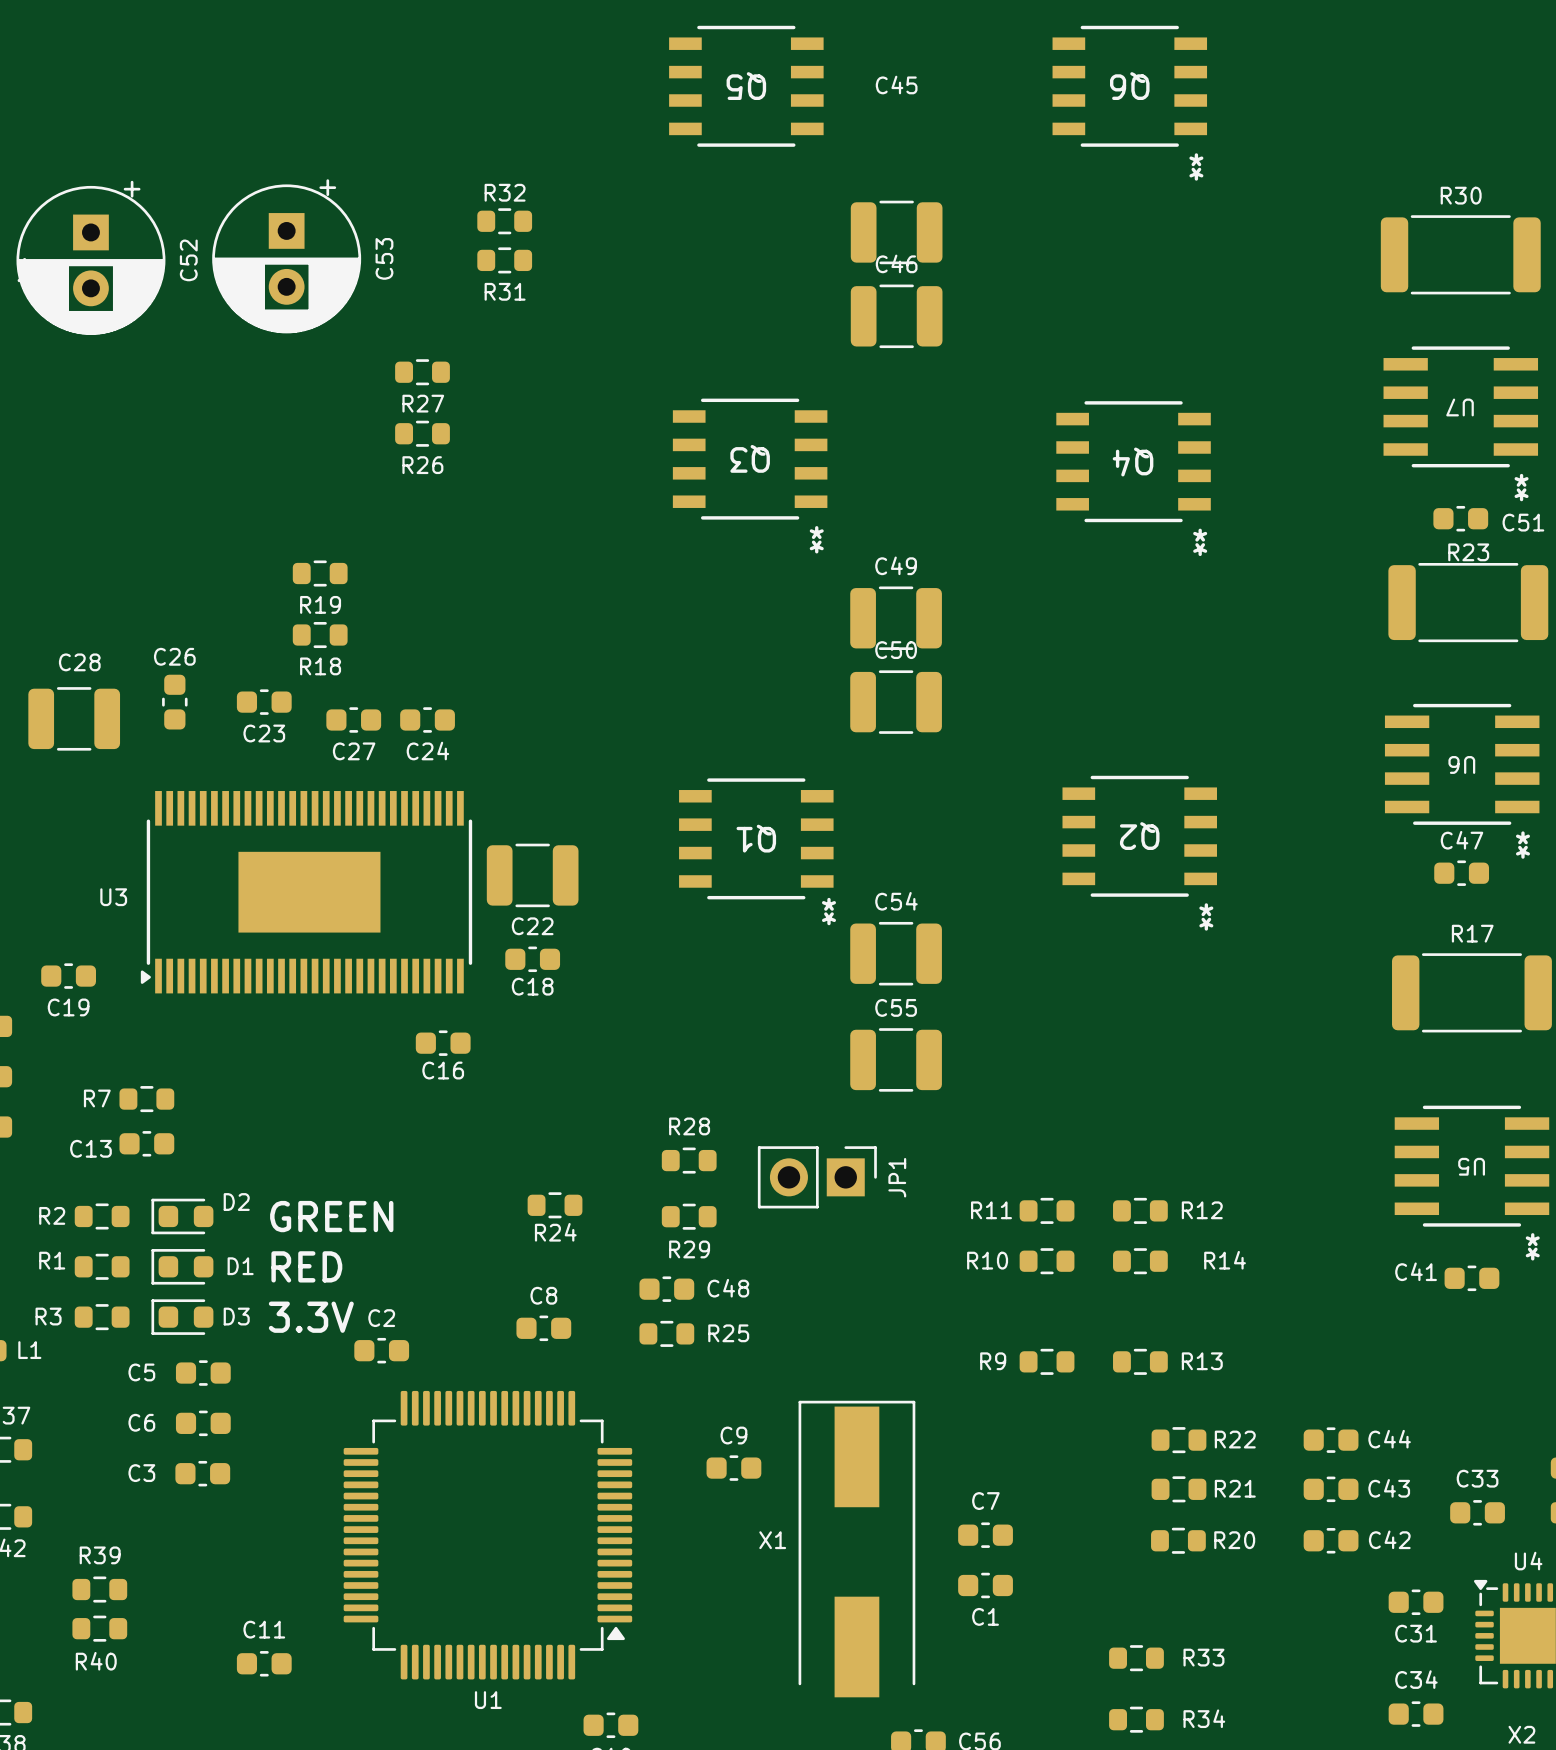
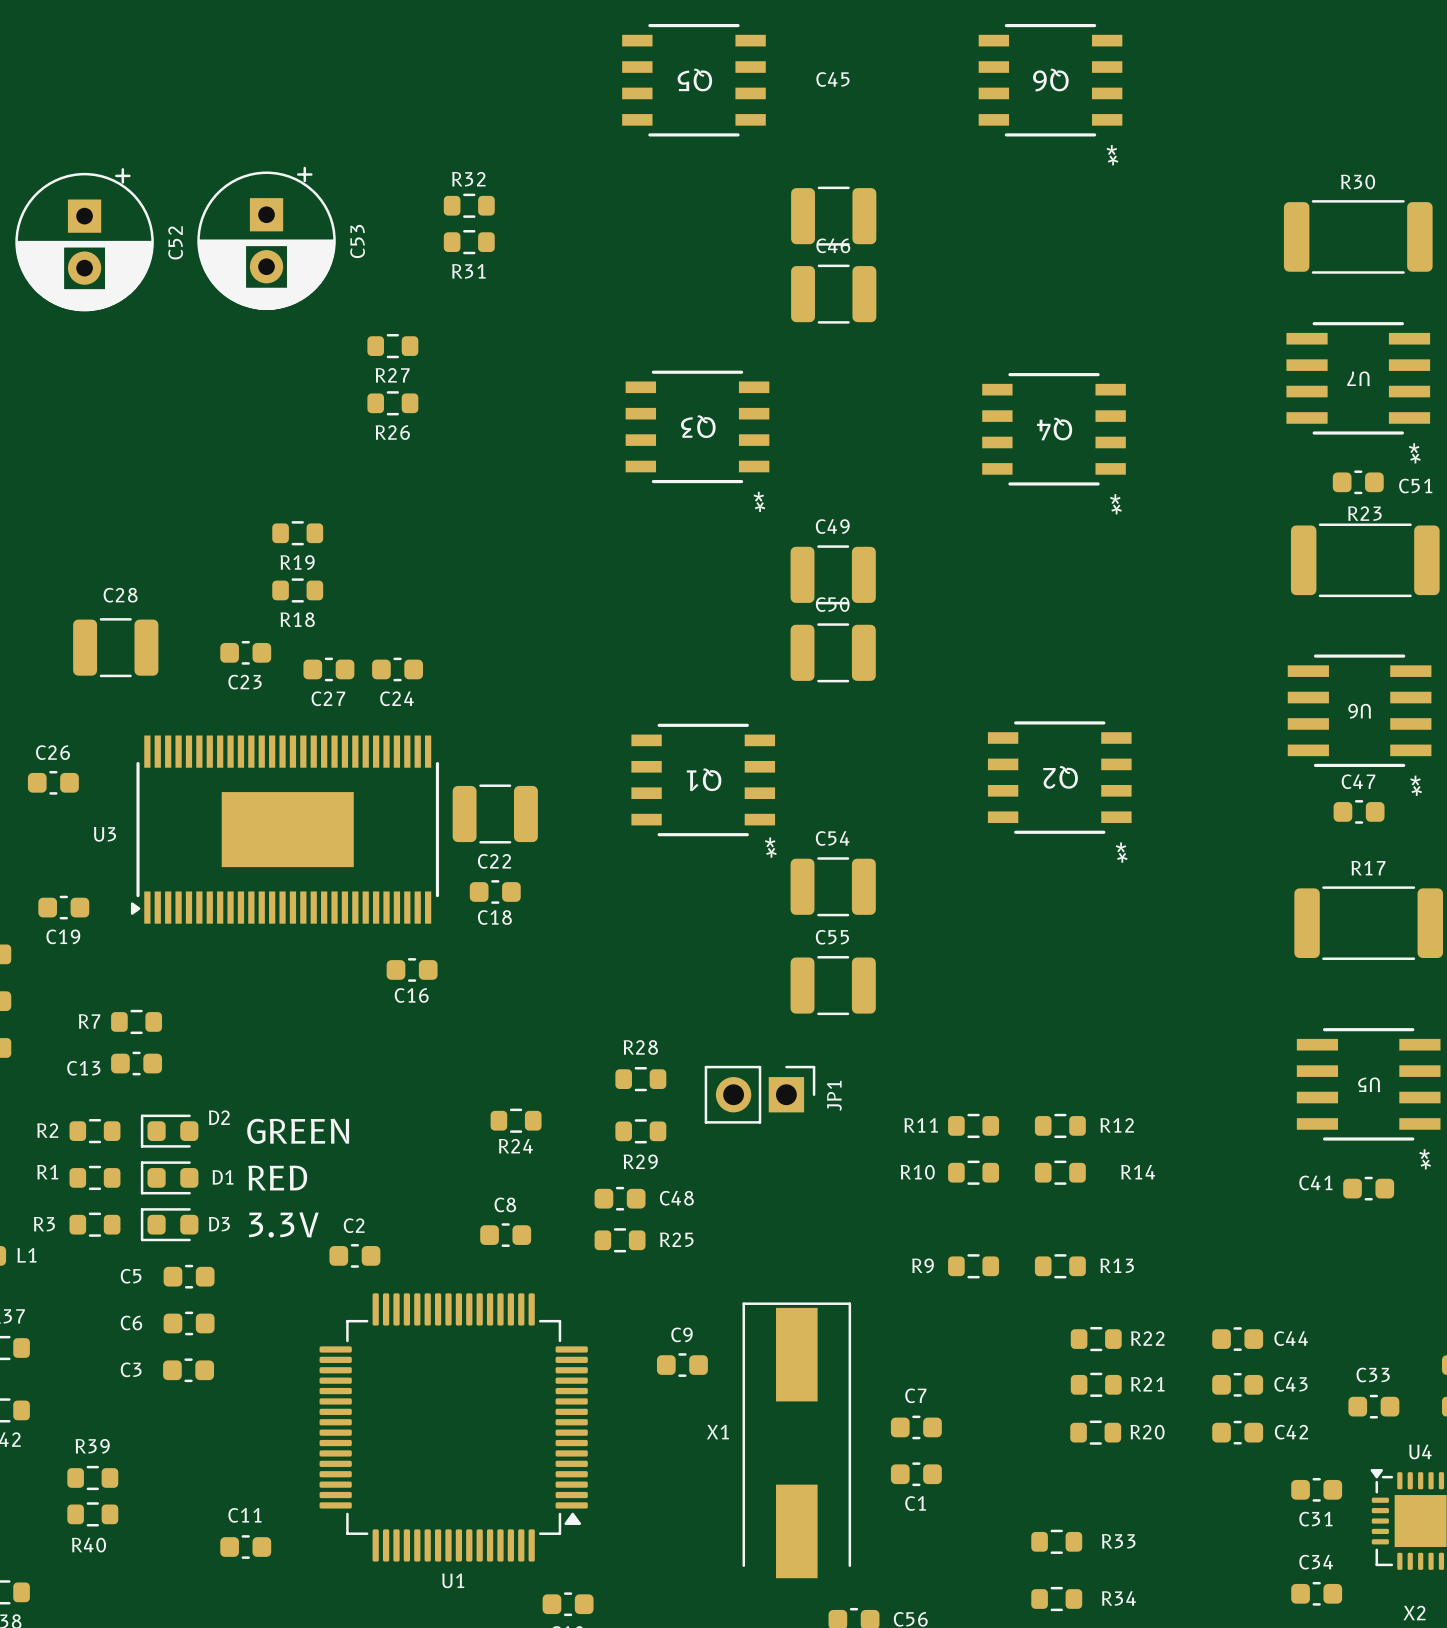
C26 rotation: 0° (174, 702) -> 90° clockwise (53, 782)
C26 position: (174, 702) -> (53, 782)
C28 position: (74, 718) -> (115, 647)

